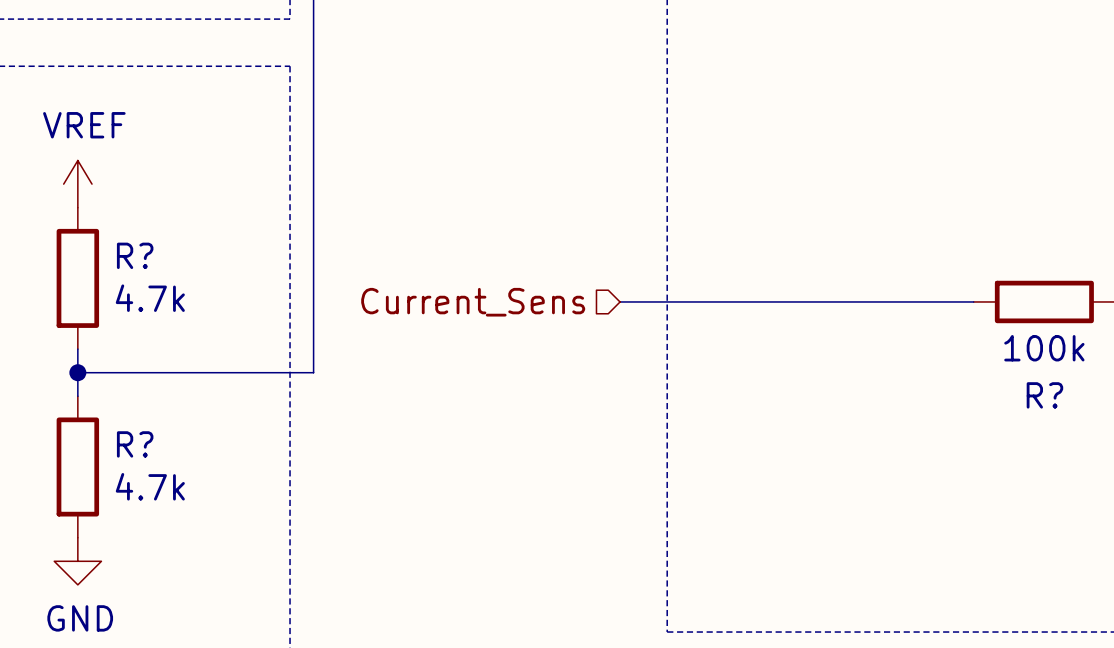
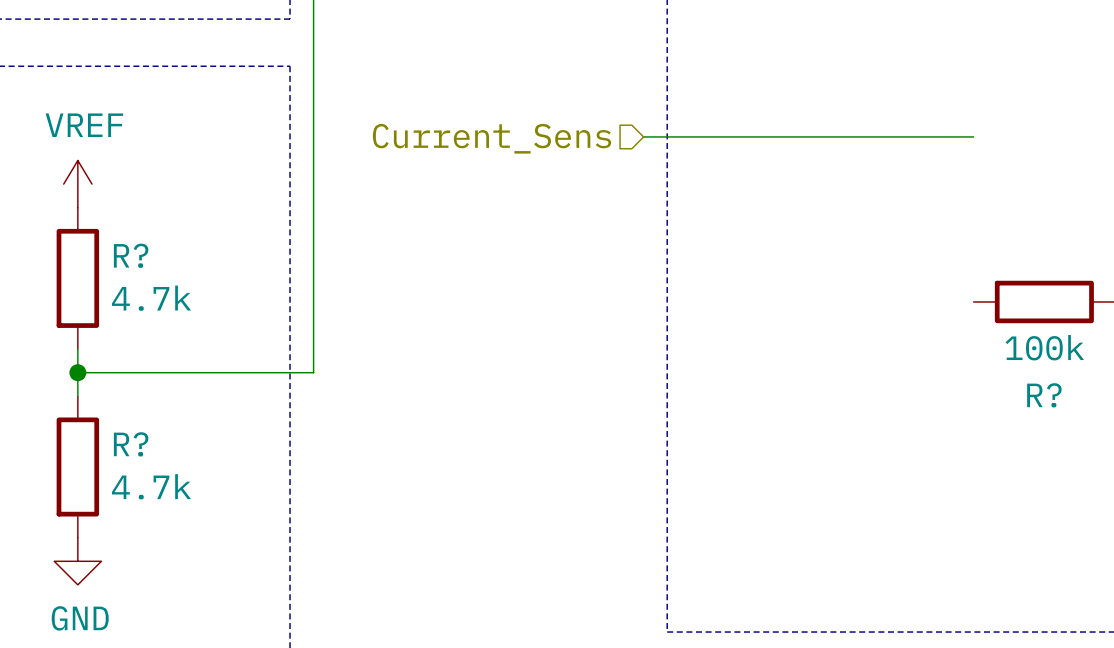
wire: none -> (643, 136) (973, 136)
wire: (620, 301) (973, 301) -> none
hierarchical label position: Current_Sens (473, 302) -> Current_Sens (491, 138)

